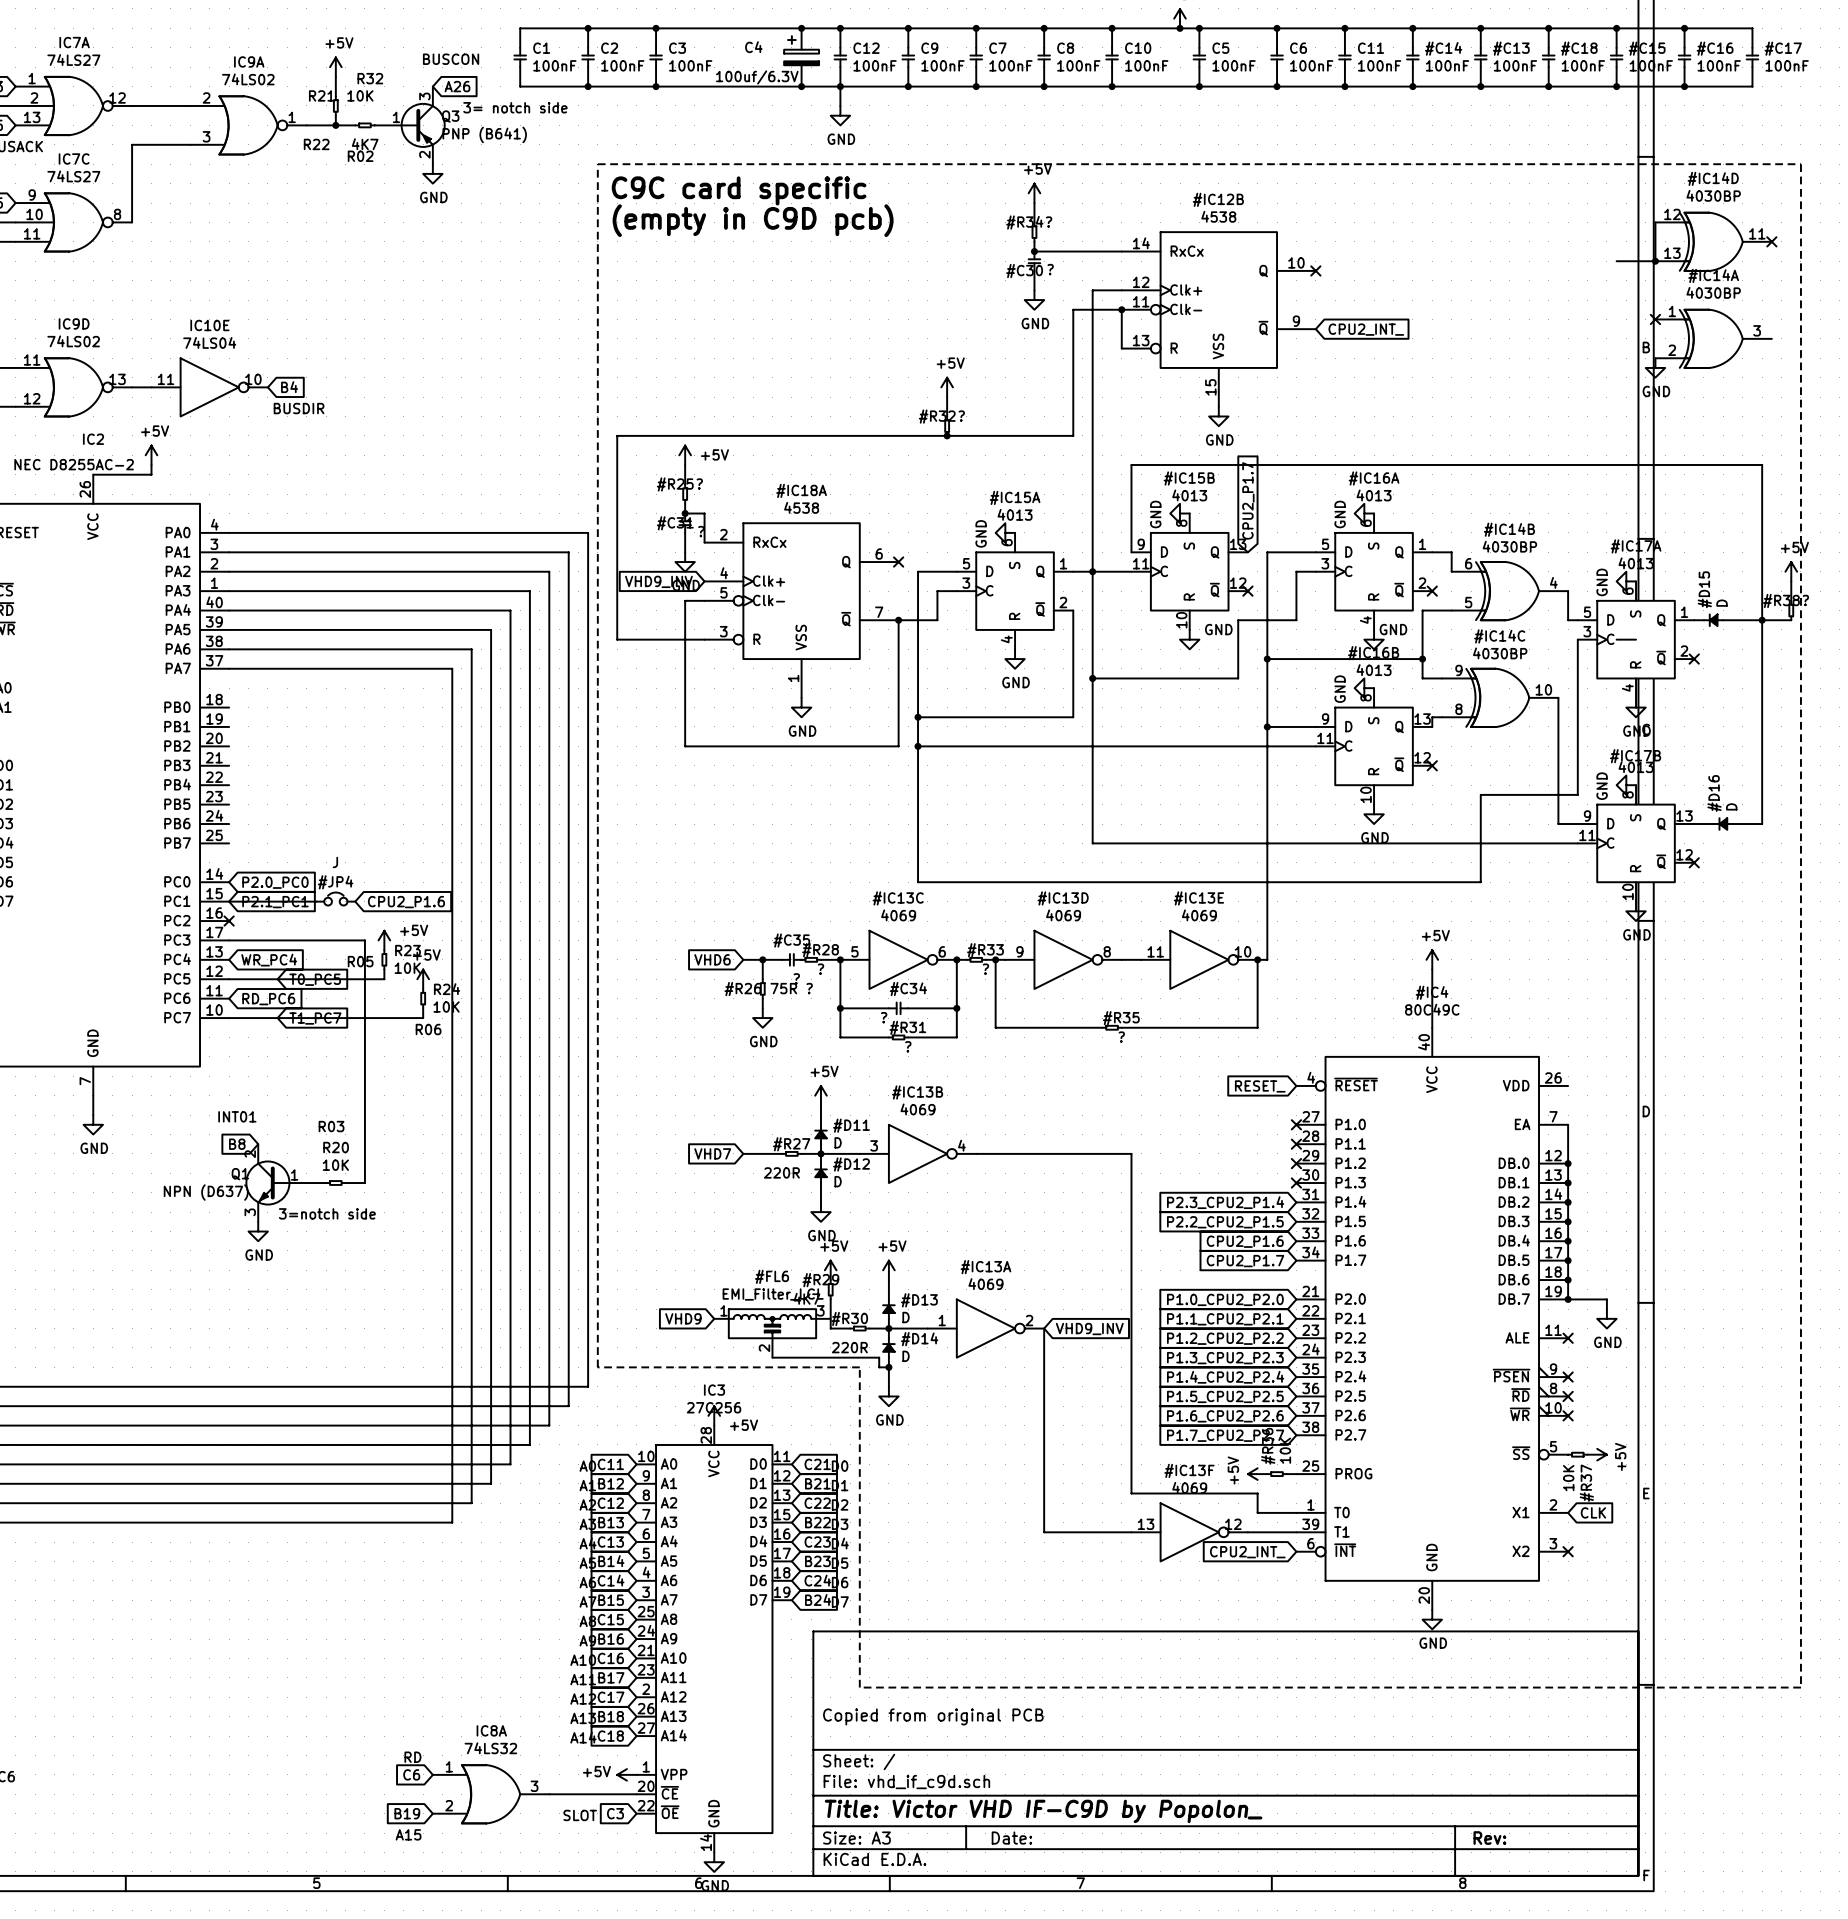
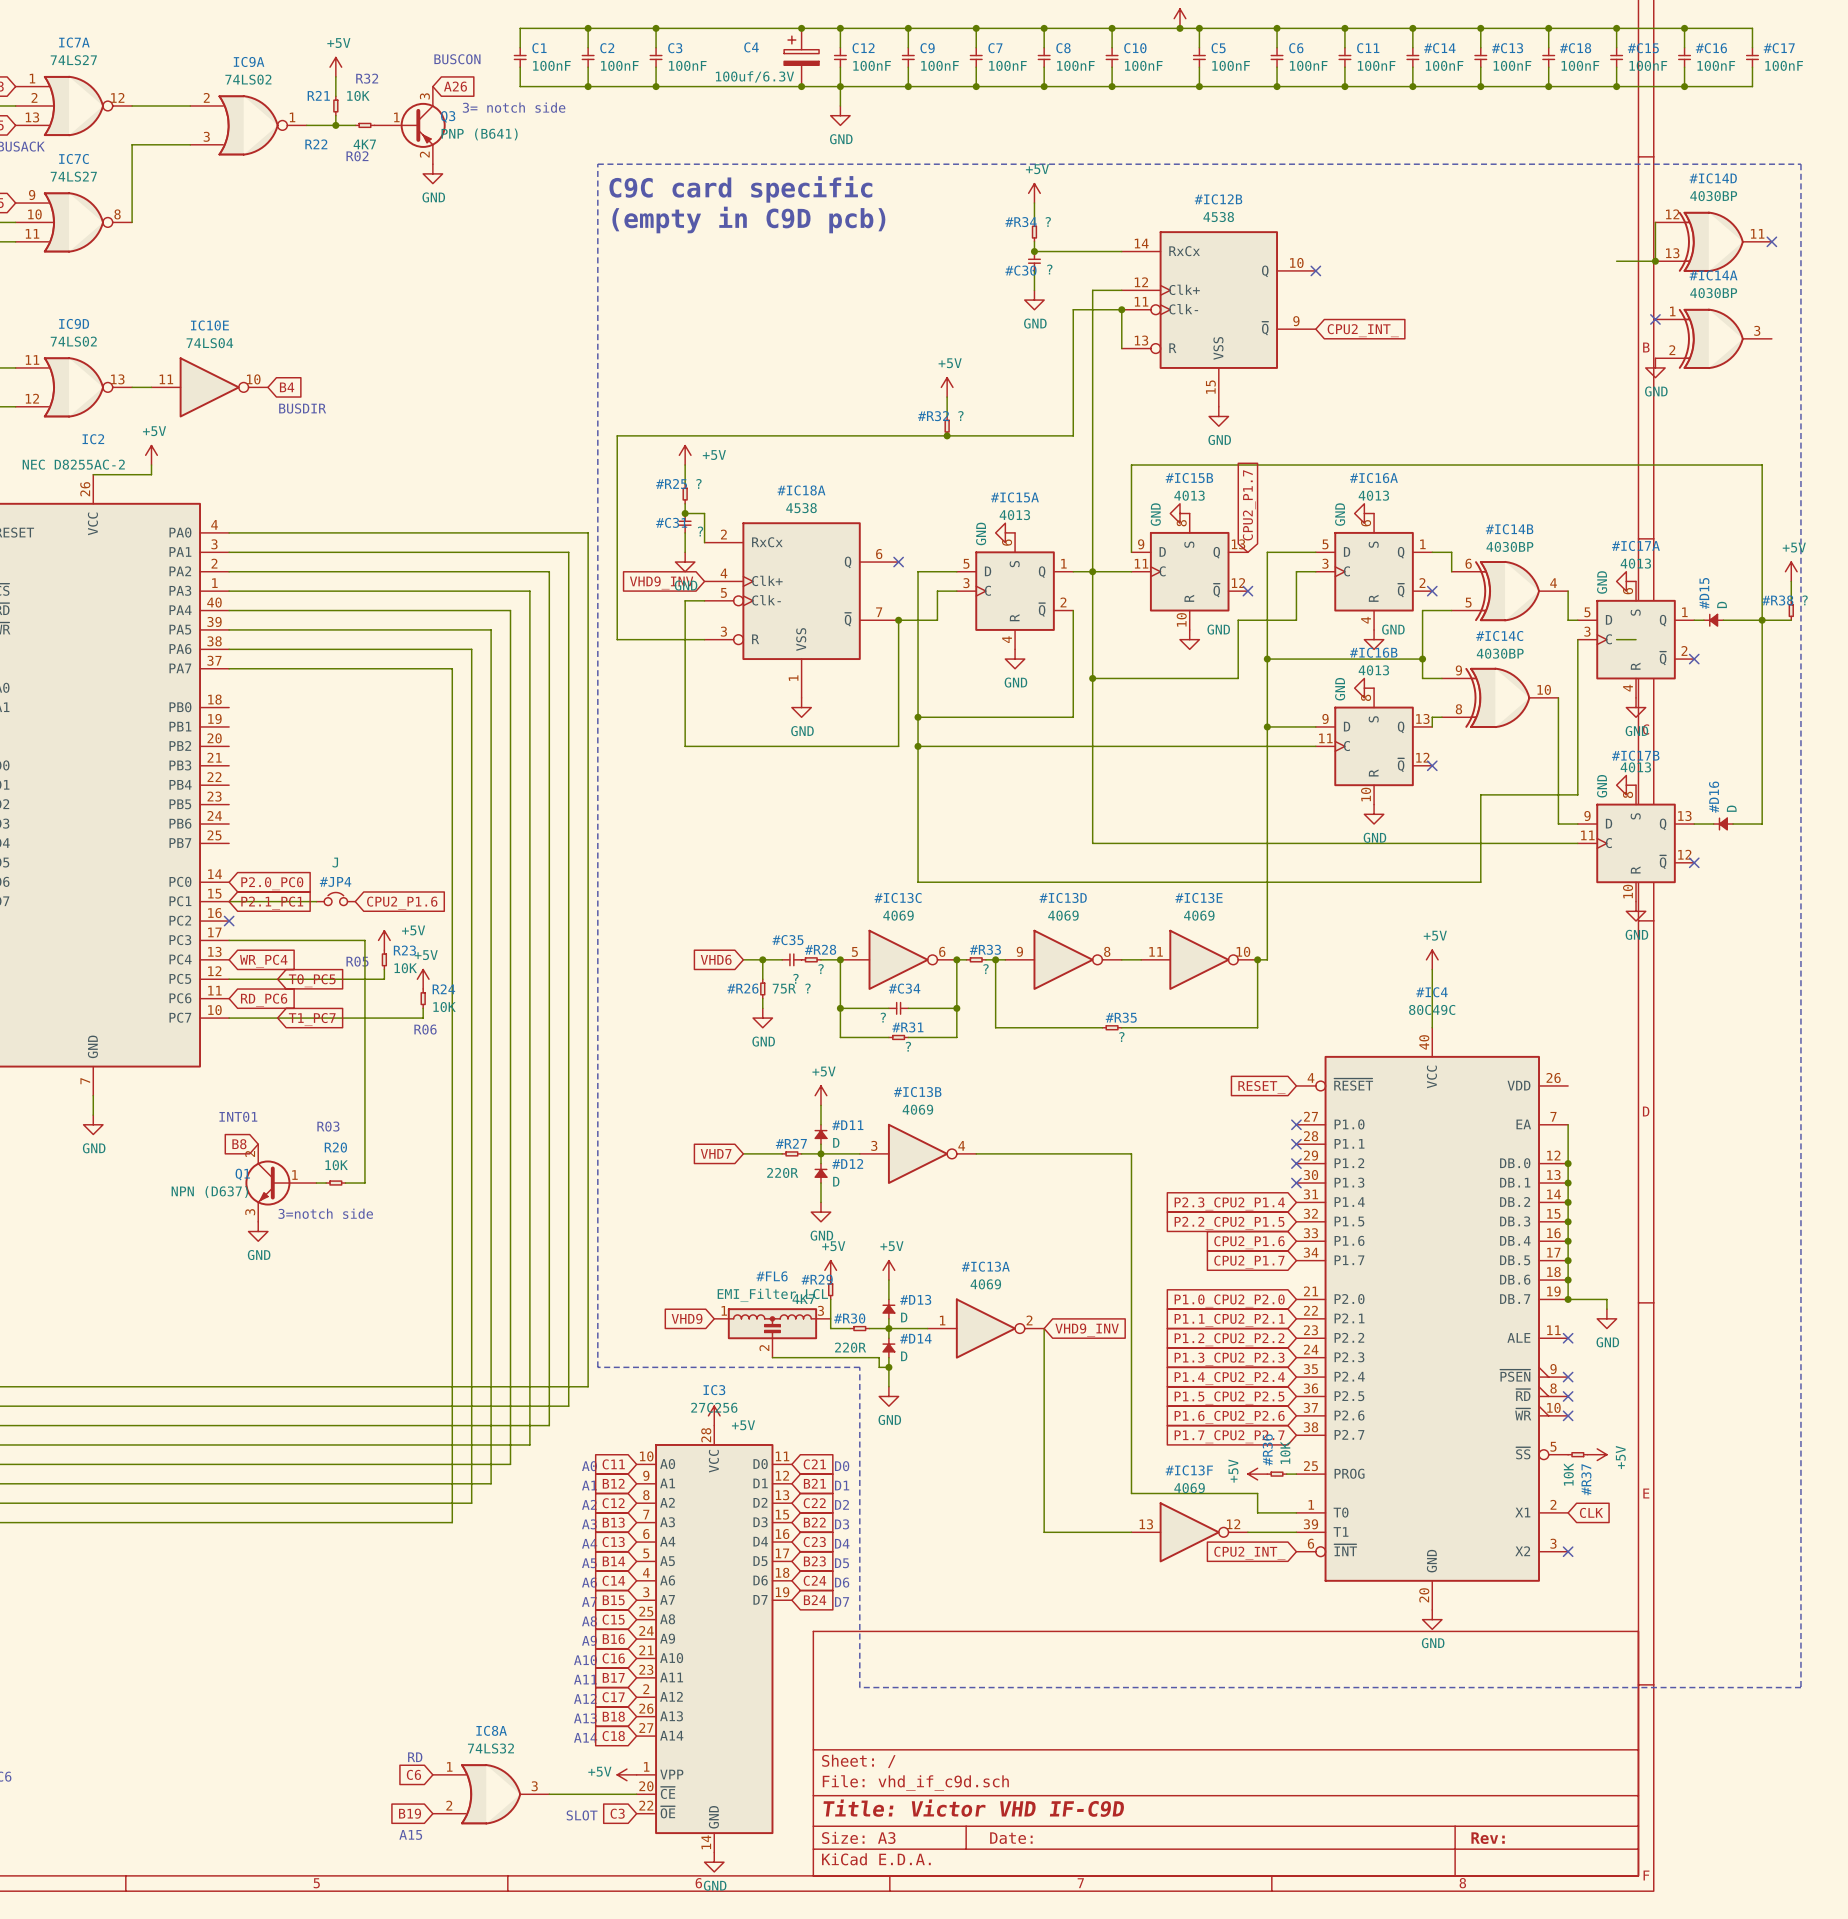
title block: Copied from original PCB (933, 1716) -> none
title block: Title: Victor VHD IF-C9D by Popolon_ (1043, 1811) -> Title: Victor VHD IF-C9D (973, 1808)

